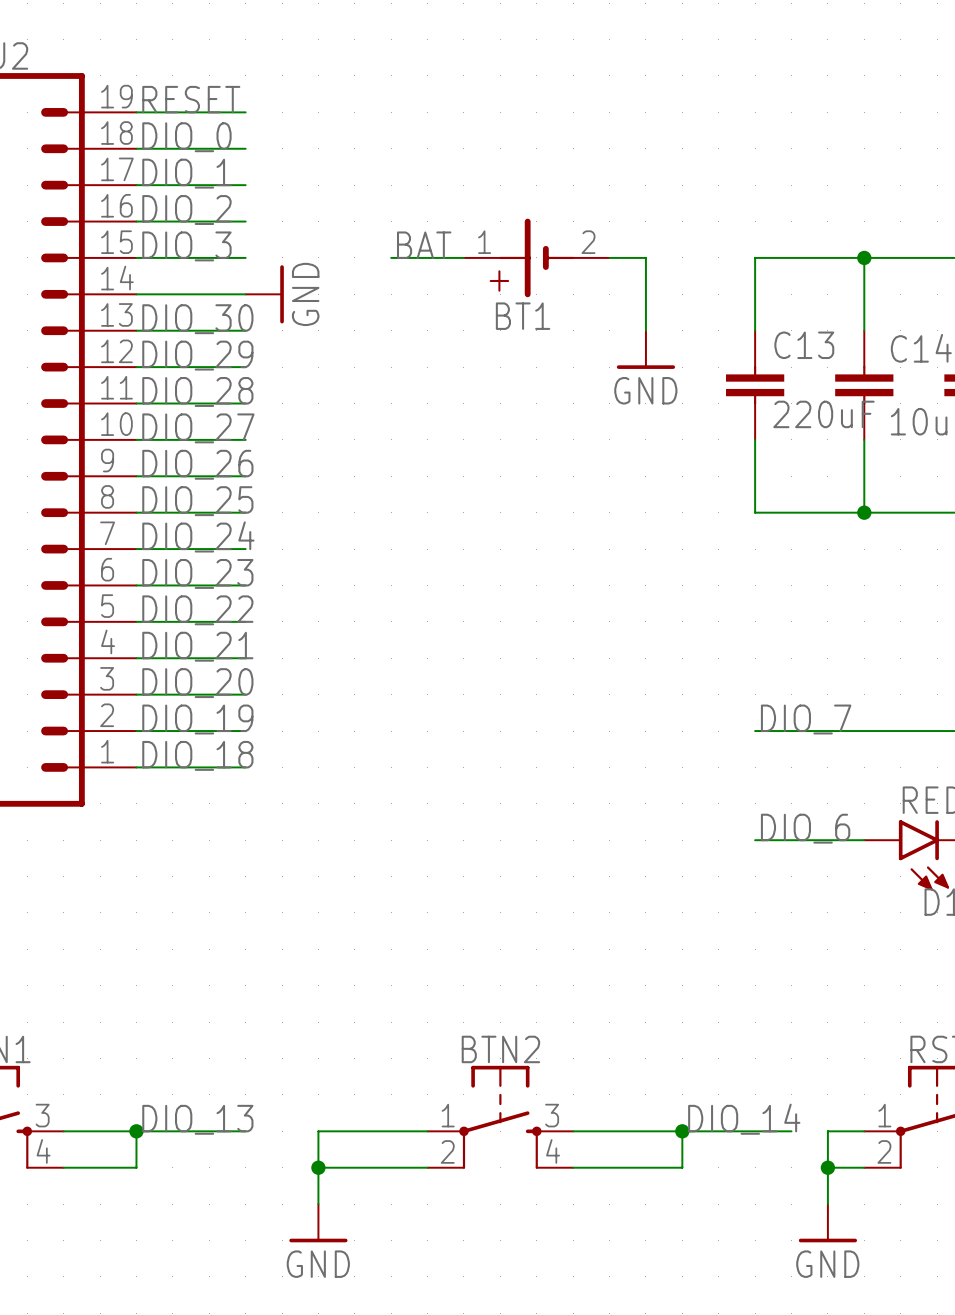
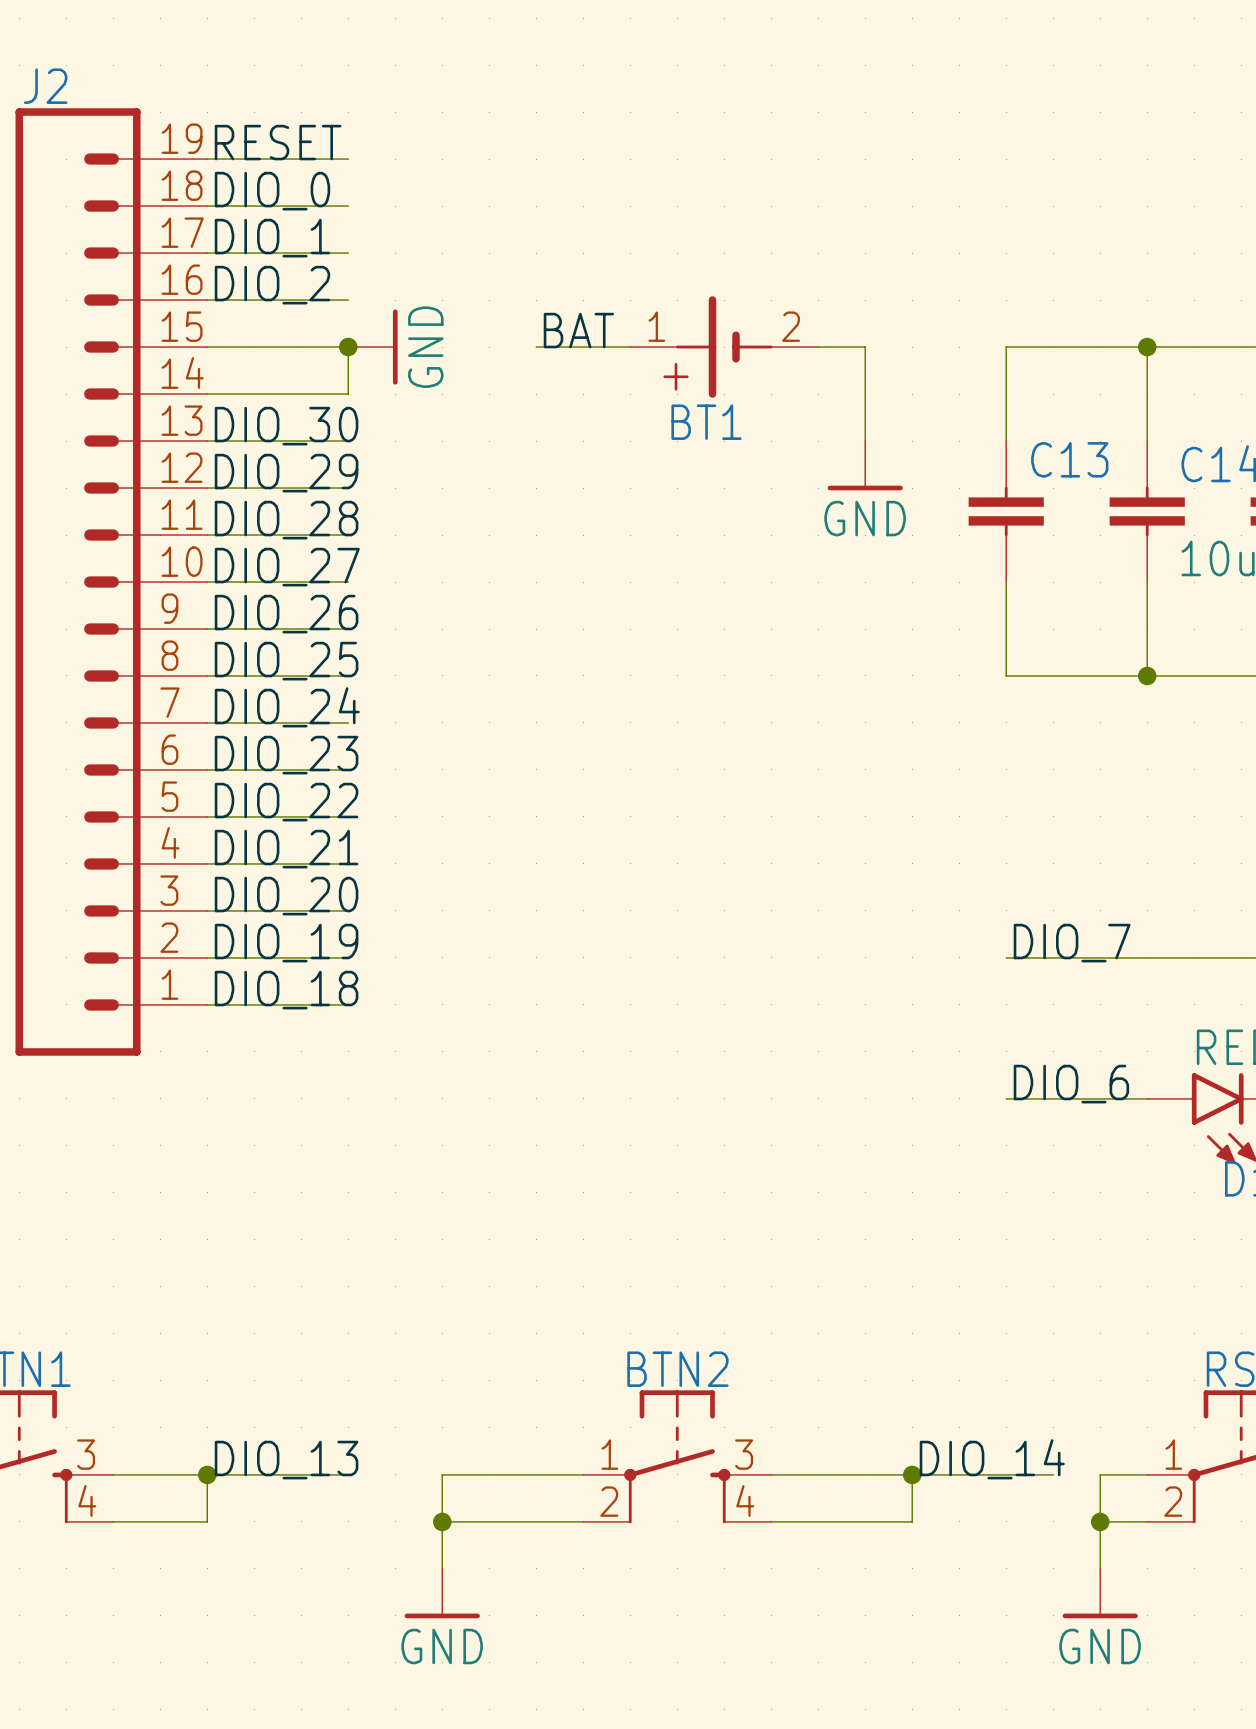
label: DIO_3 (186, 246) -> none
wire: none -> (348, 347) (348, 394)
junction: none -> (348, 347)
power symbol position: GND (264, 294) -> GND (372, 347)
C13 value: 220uF (823, 414) -> none

